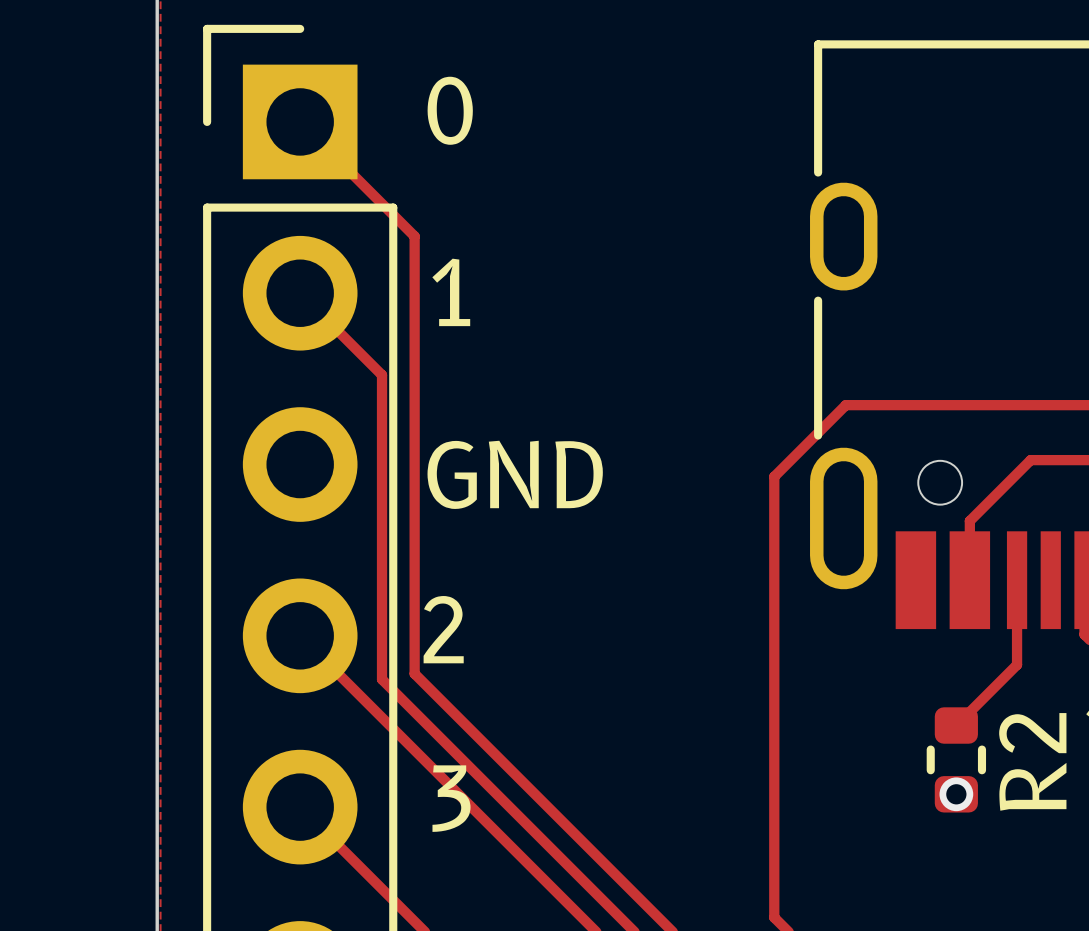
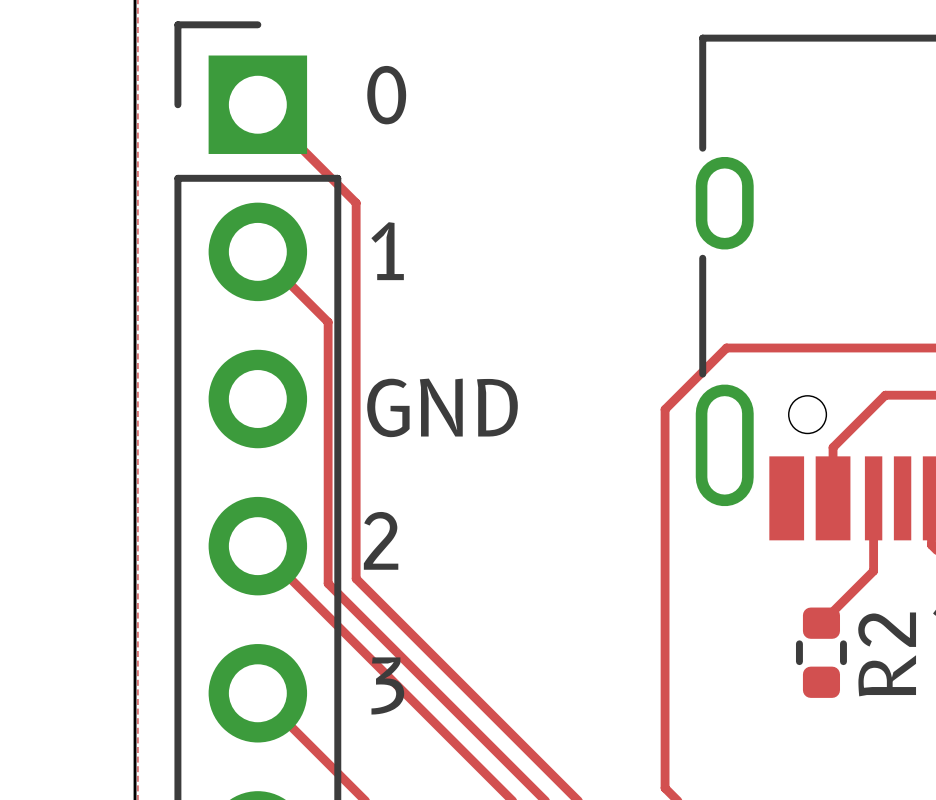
via: (956, 794) -> none

